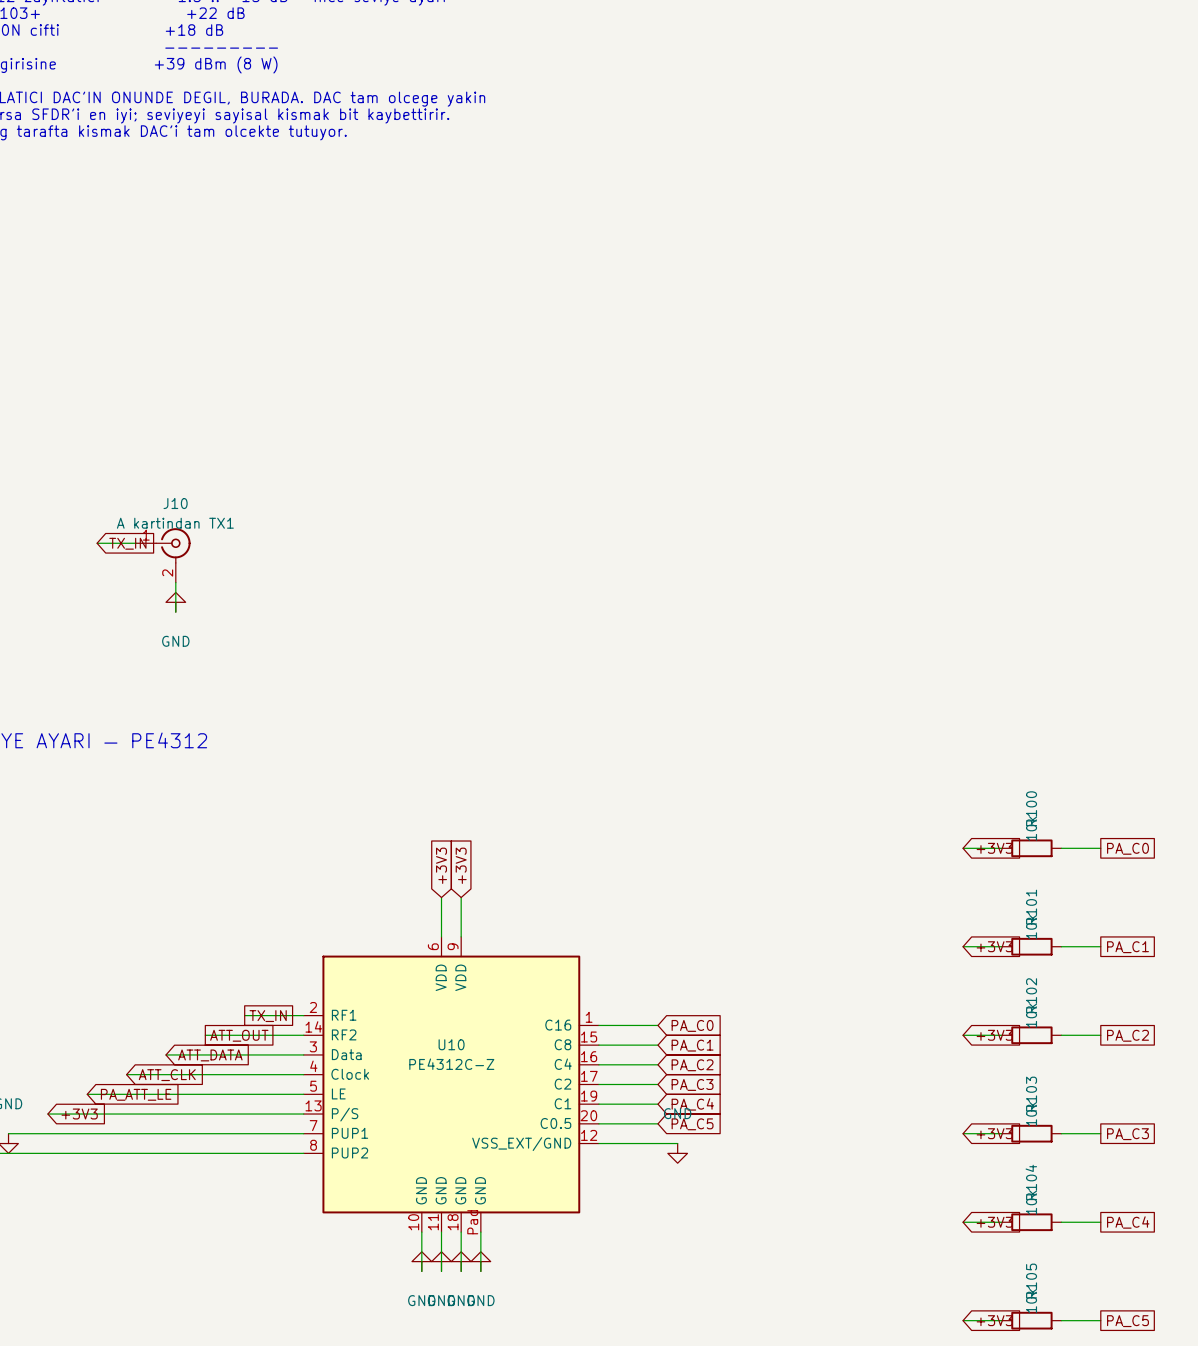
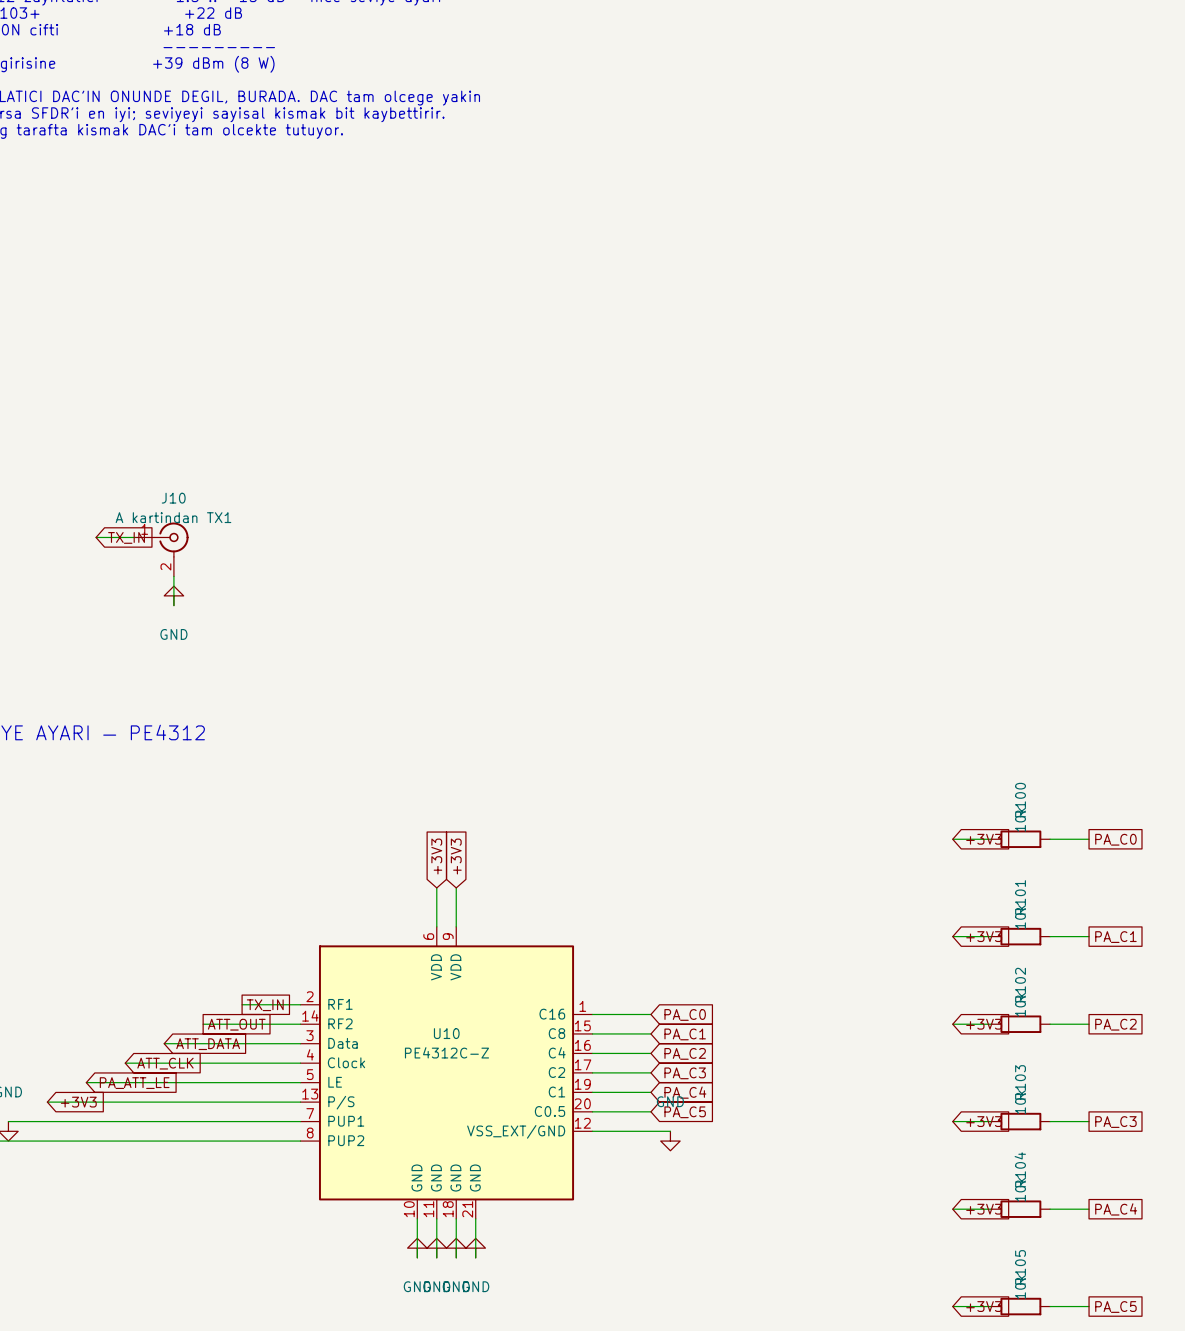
U10 pin number: Pad (472, 1222) -> 21 (467, 1209)

